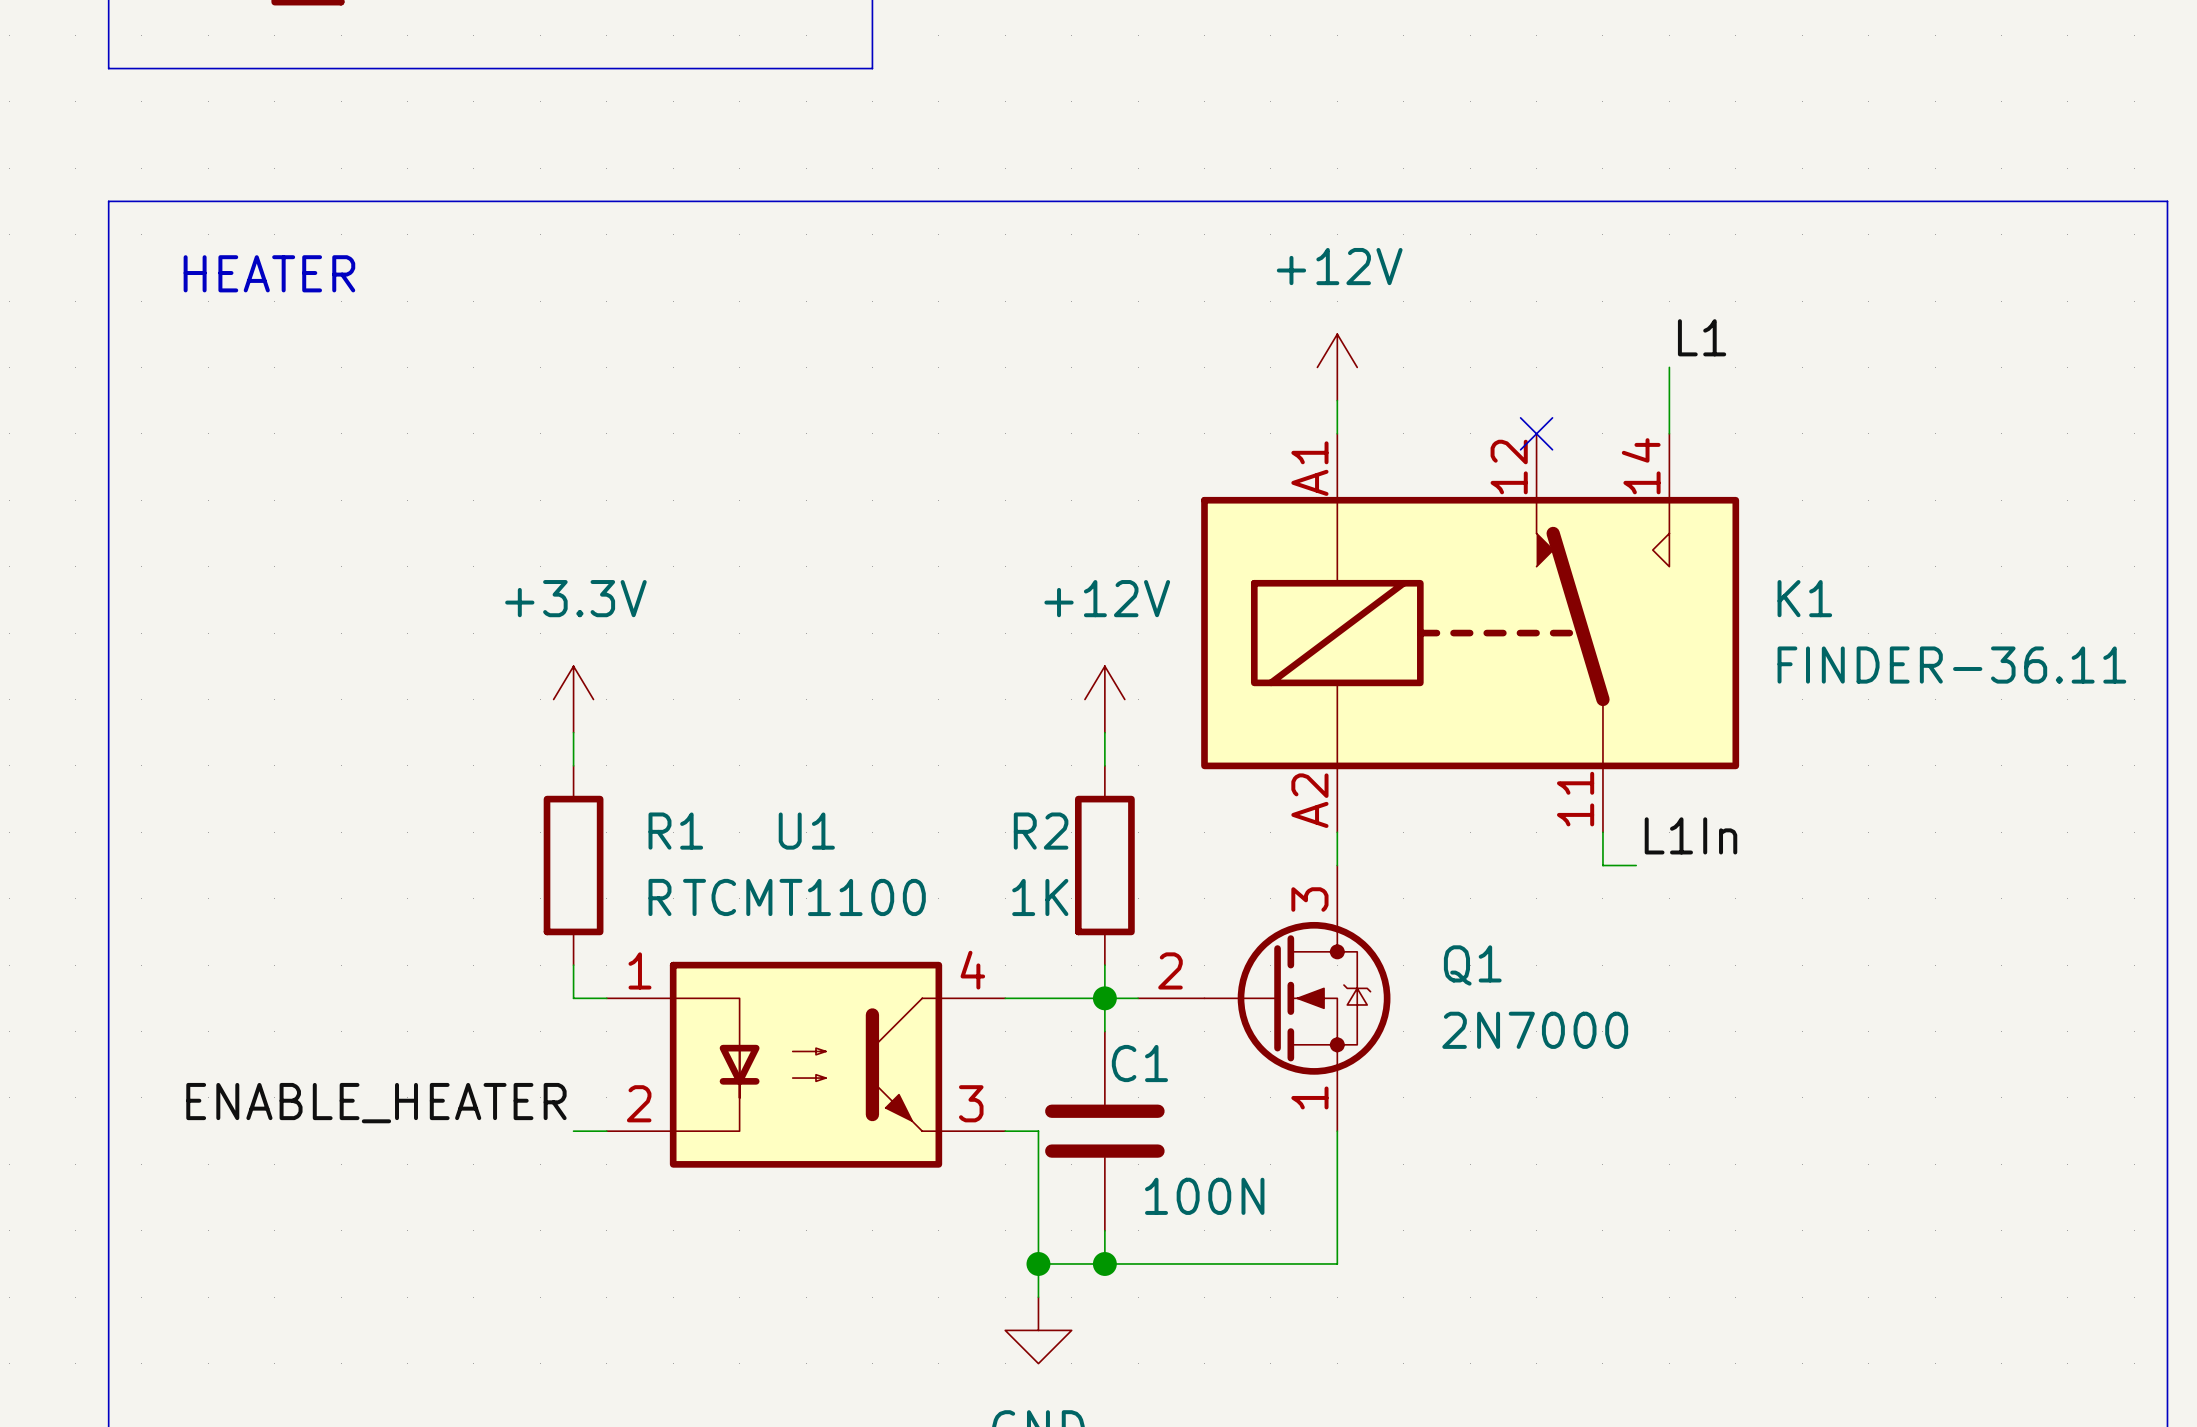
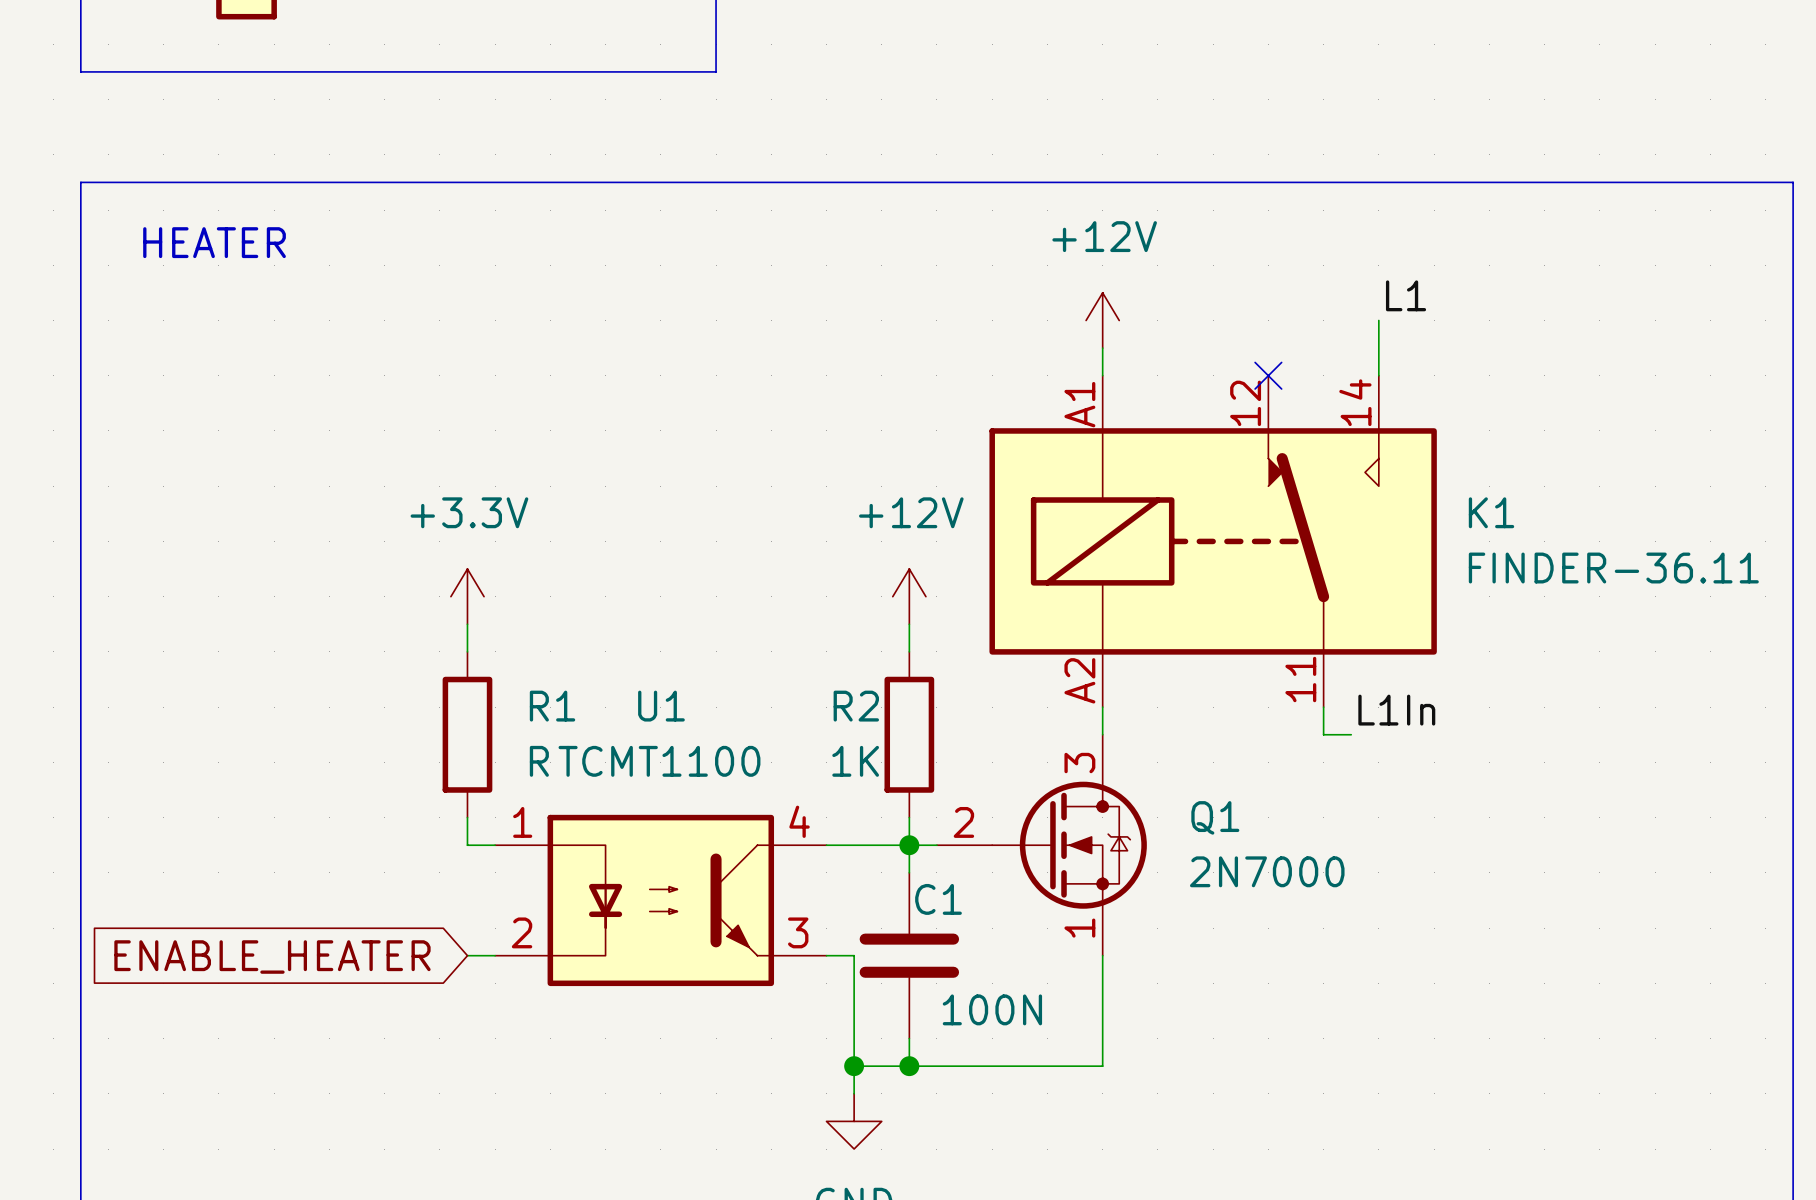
label: ENABLE_HEATER (376, 1103) -> none
global label: none -> ENABLE_HEATER (272, 957)

